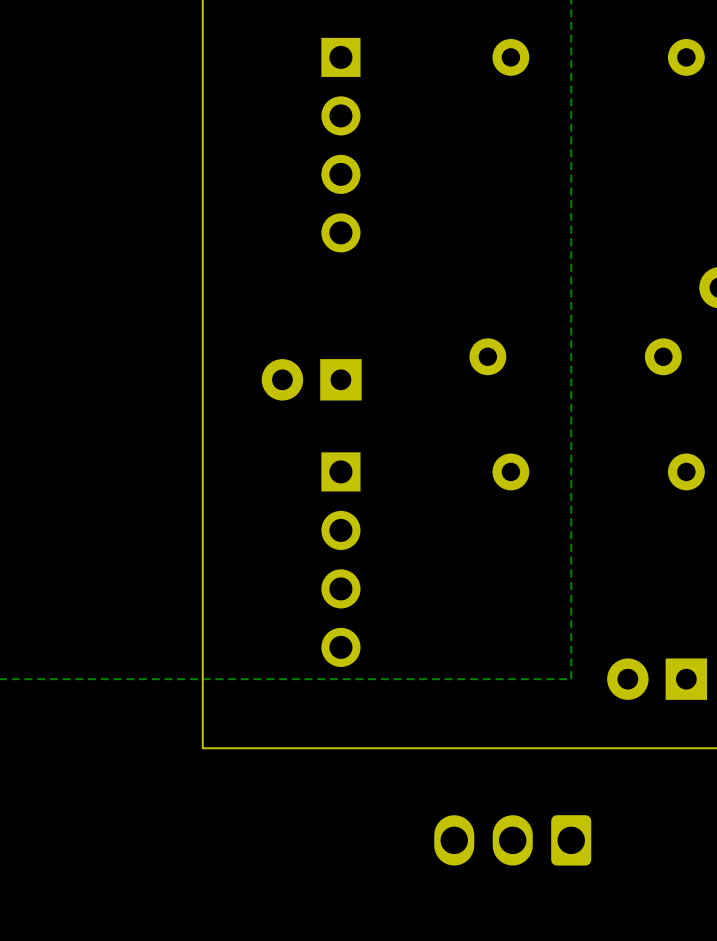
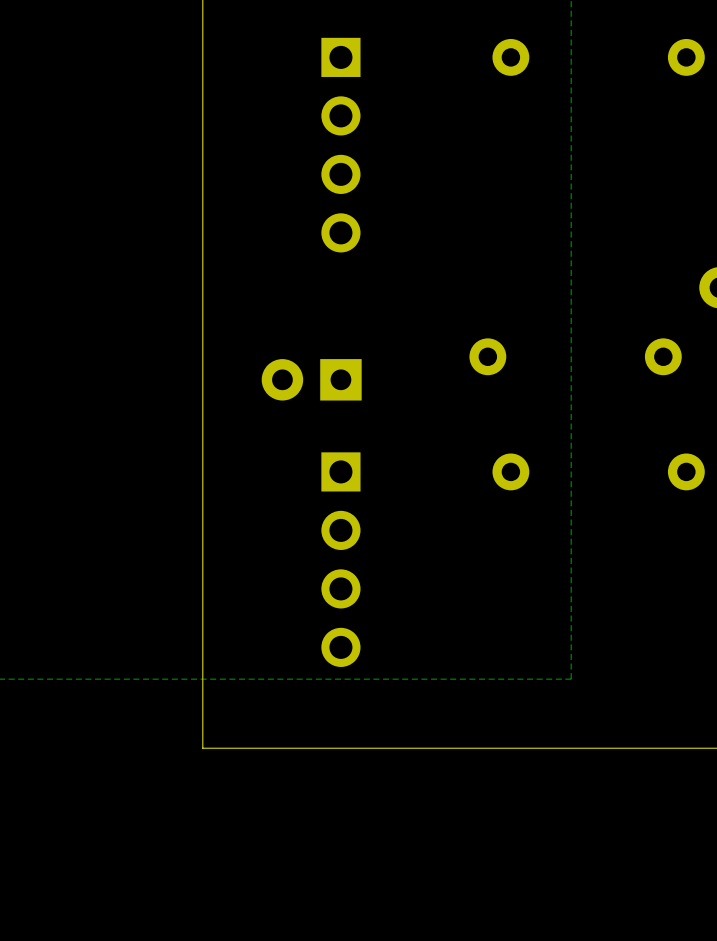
part: (657, 679) -> none
part: (512, 840) -> none

